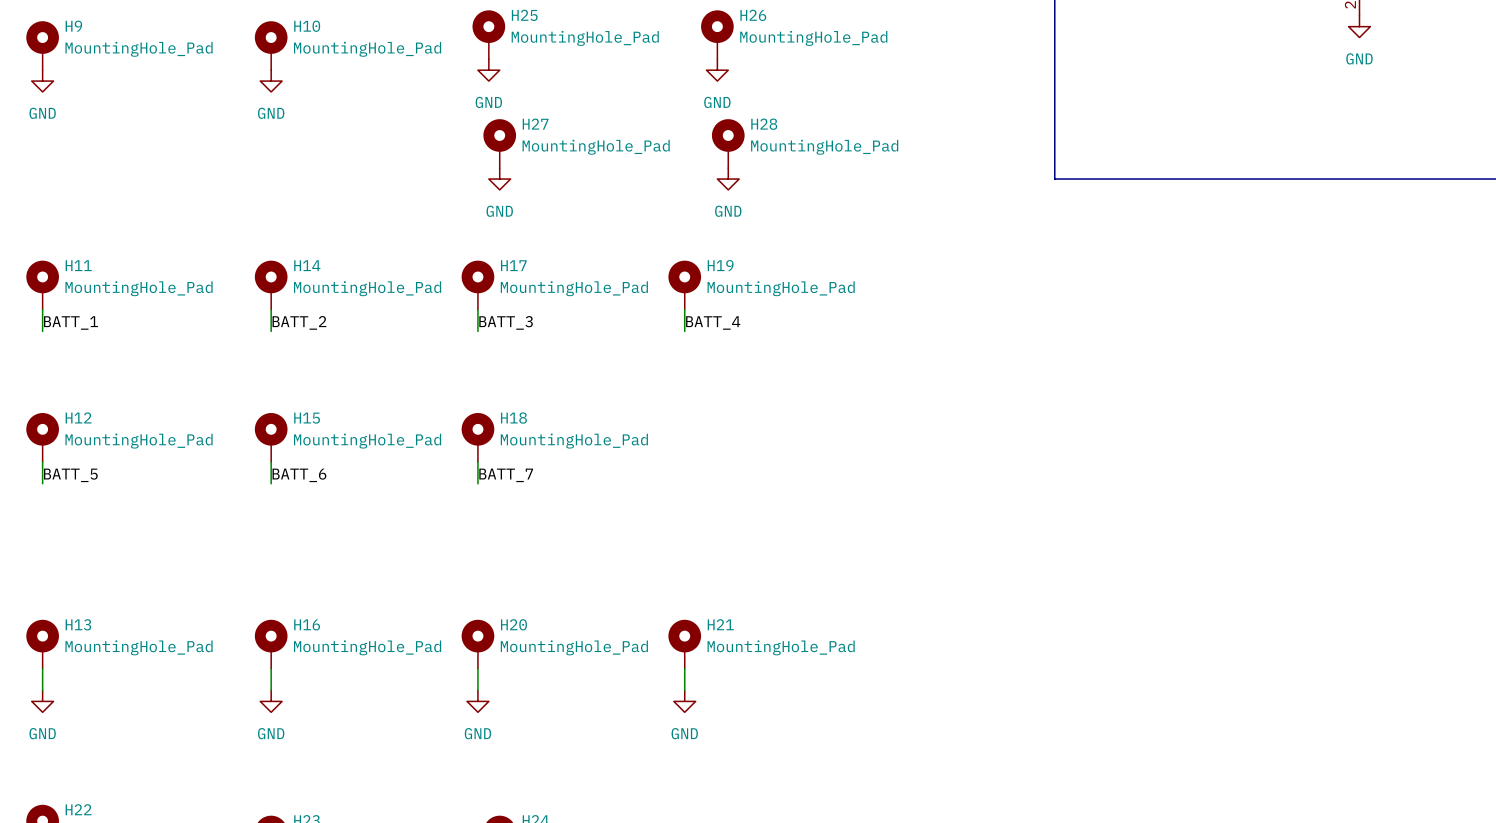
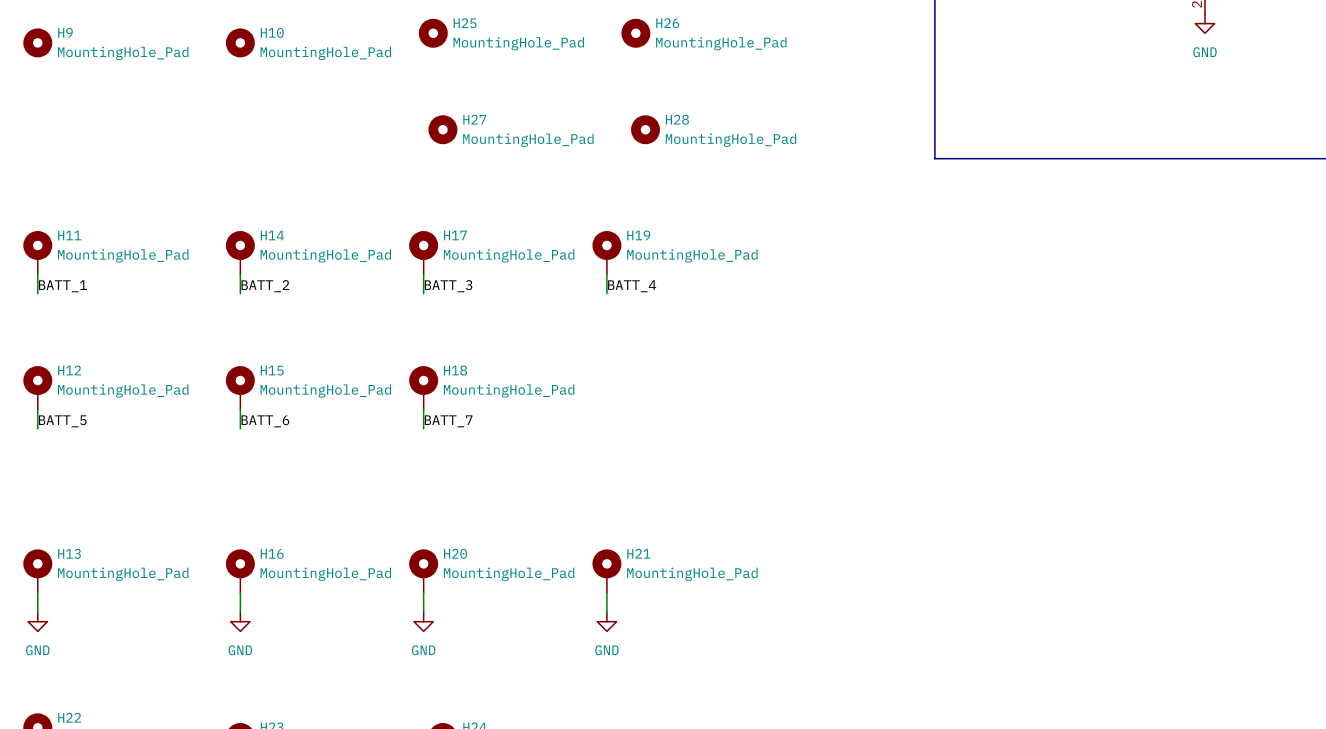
H25 symbol: [472, 10, 506, 60] -> [418, 18, 448, 48]
H26 symbol: [701, 10, 734, 60] -> [621, 18, 651, 48]
H9 symbol: [26, 21, 59, 71] -> [23, 28, 53, 58]
H10 symbol: [254, 21, 288, 71] -> [225, 28, 255, 58]
power symbol: GND (488, 70) -> none
power symbol: GND (717, 70) -> none
power symbol: GND (42, 81) -> none
power symbol: GND (271, 81) -> none
H27 symbol: [483, 119, 517, 169] -> [428, 115, 458, 145]
H28 symbol: [711, 119, 745, 169] -> [631, 115, 660, 145]
power symbol: GND (499, 179) -> none
power symbol: GND (728, 179) -> none

